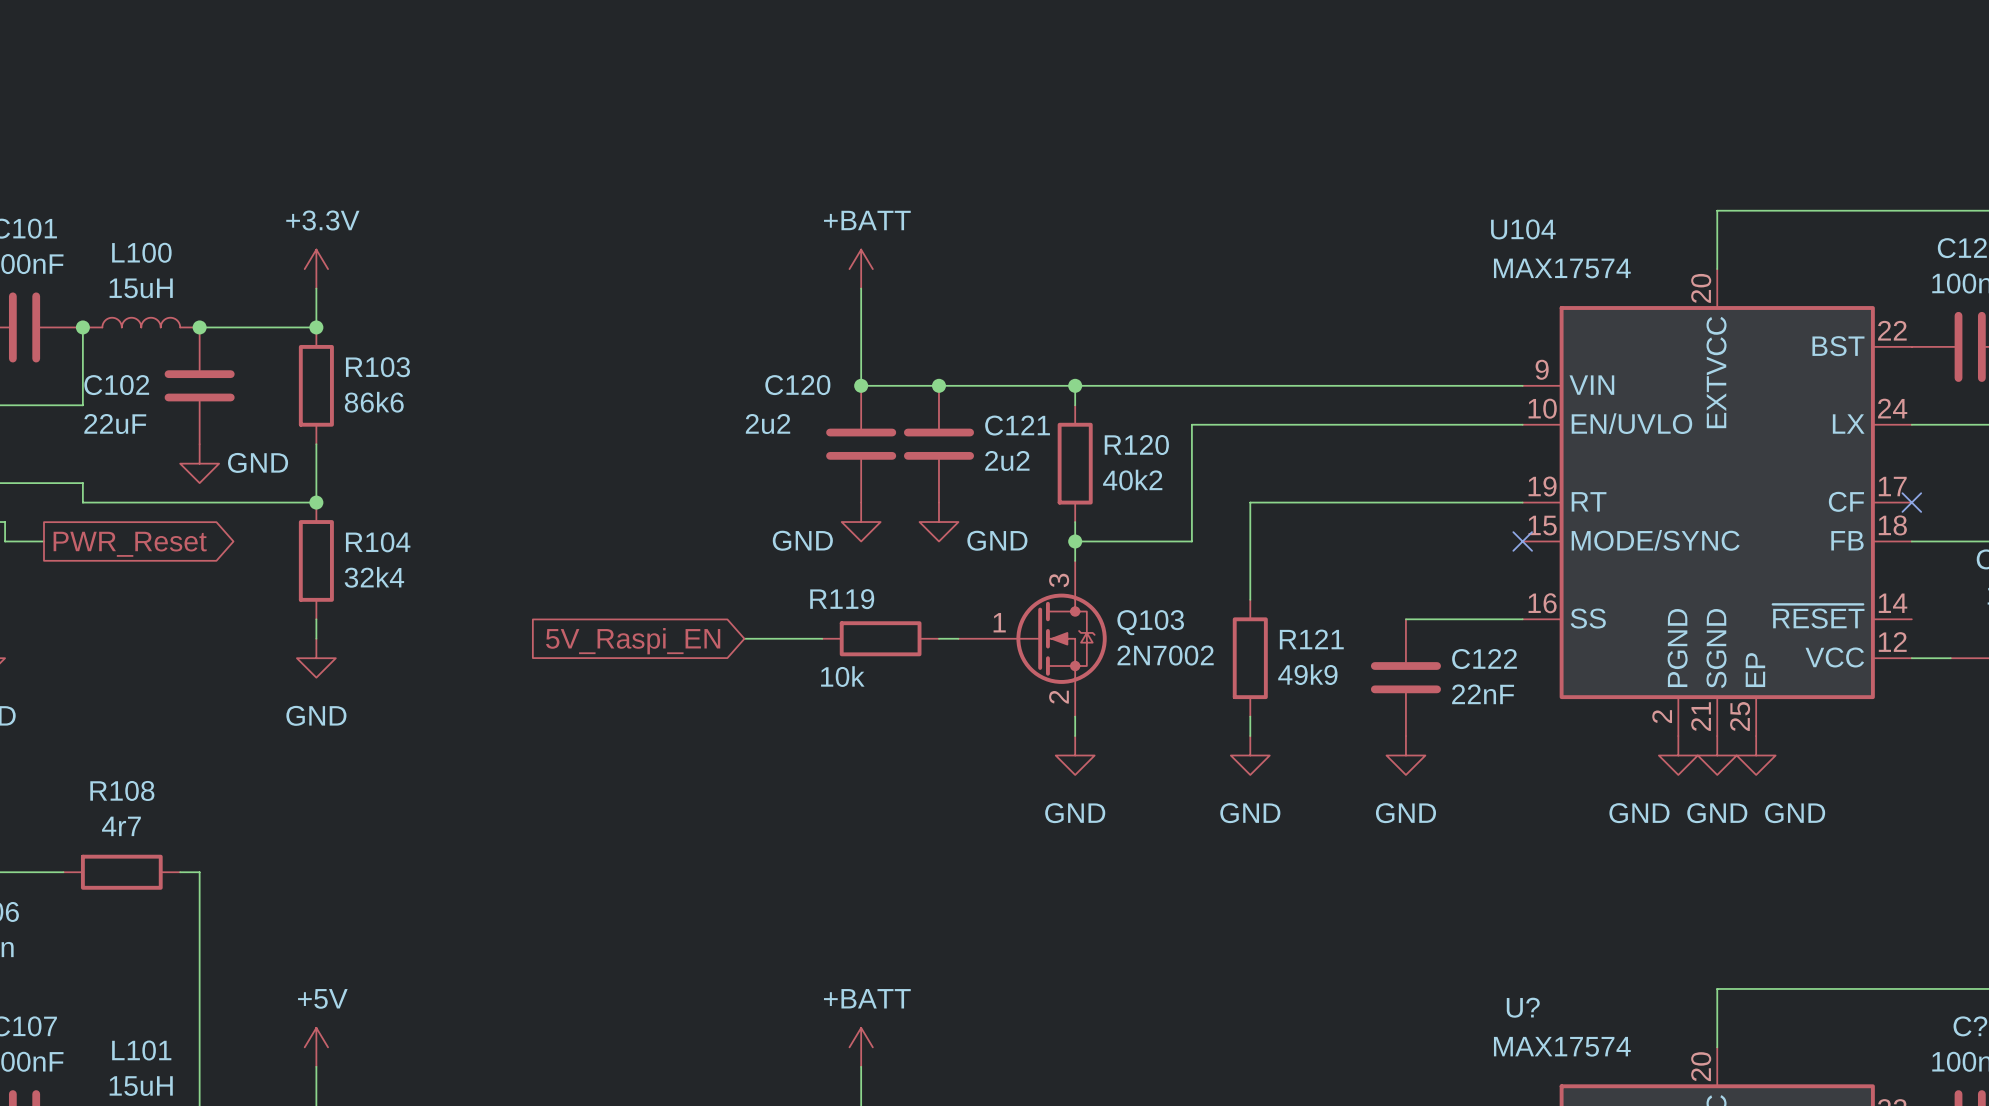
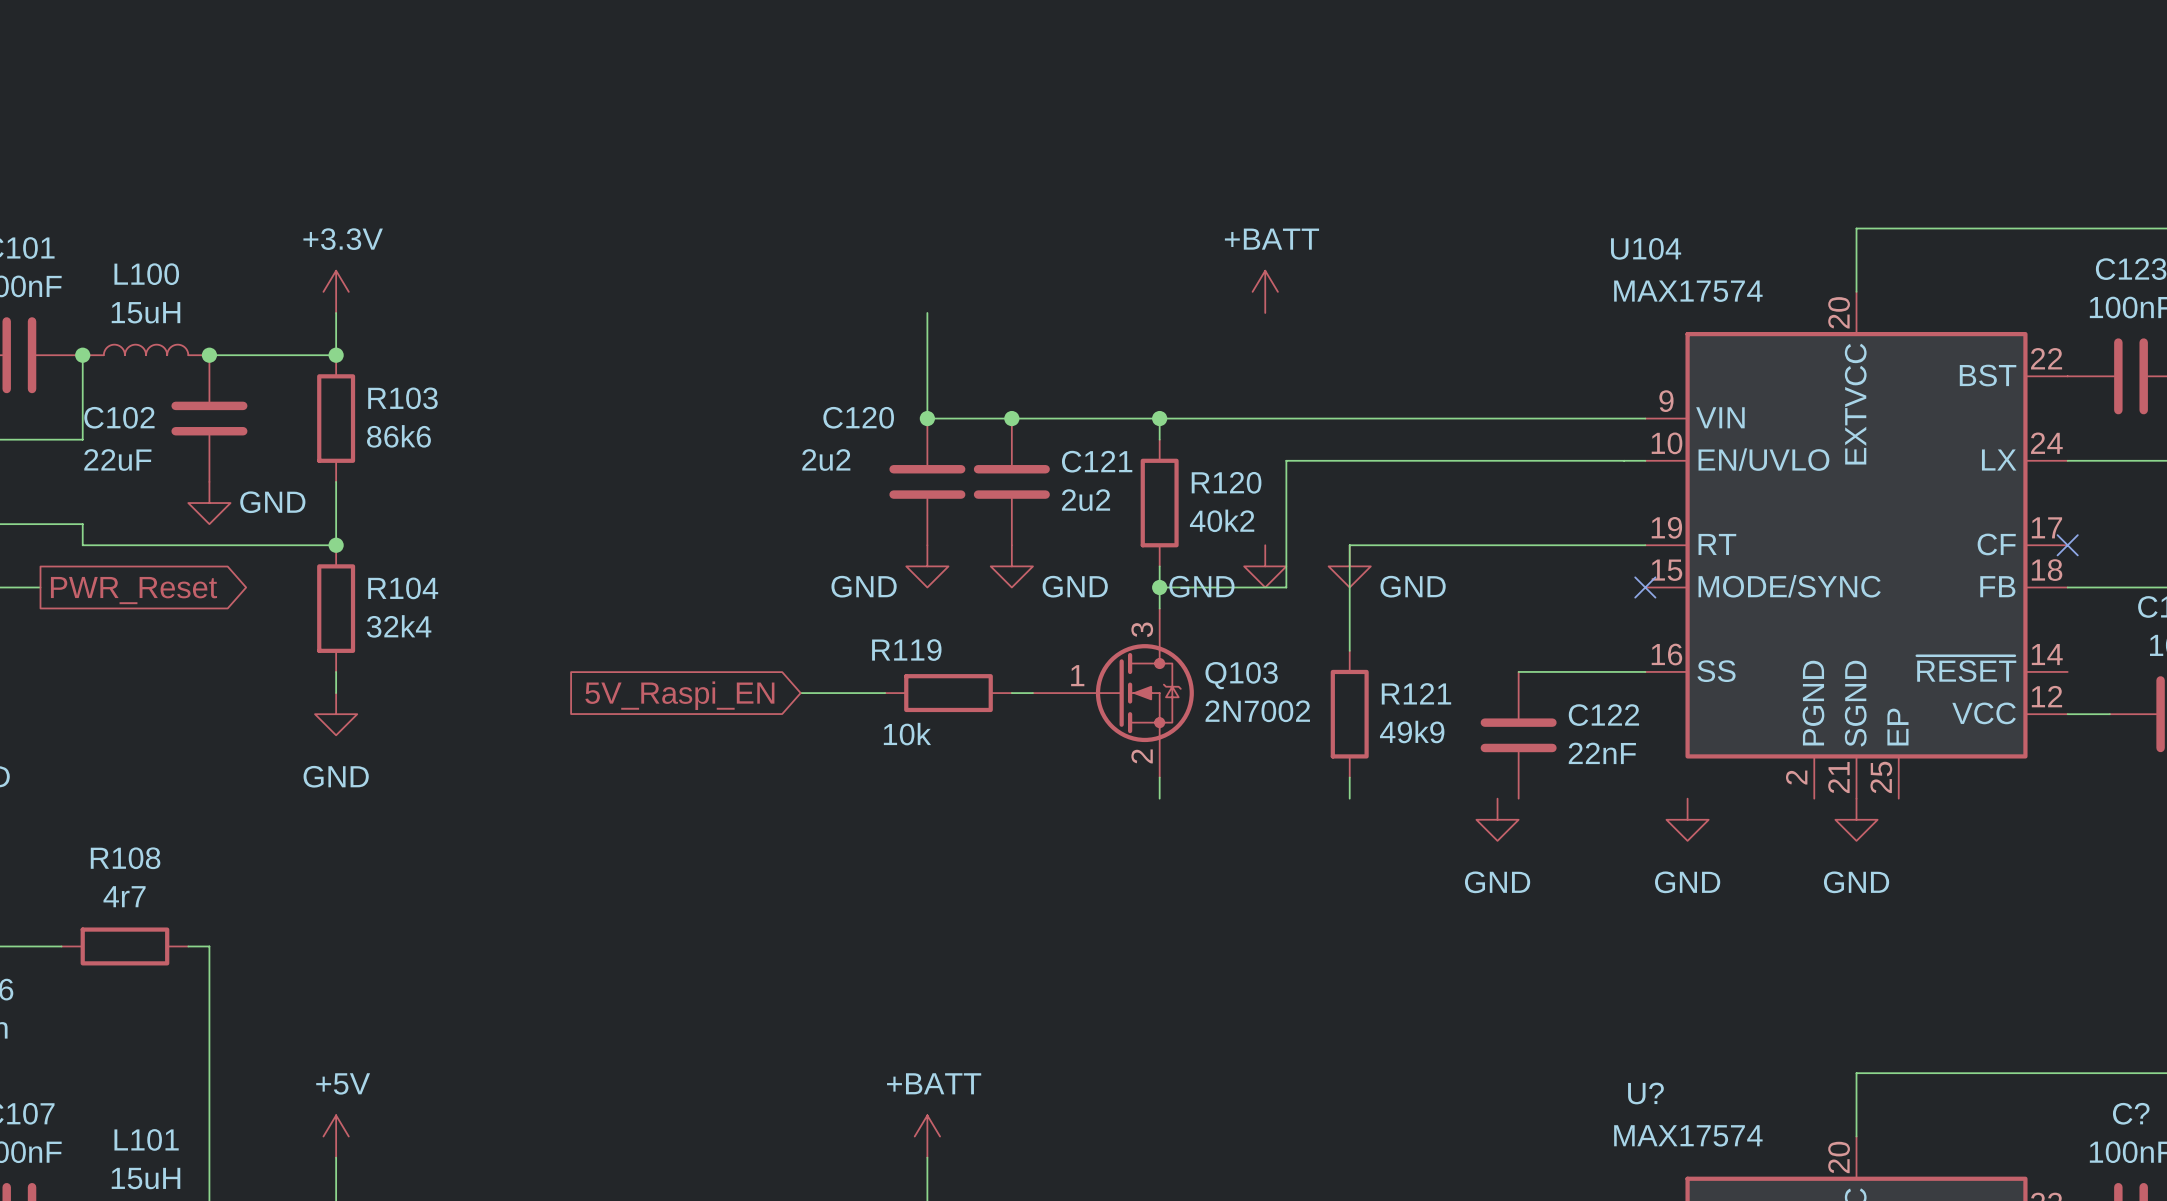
power symbol position: +BATT (861, 269) -> +BATT (1265, 291)
power symbol: none -> GND (1265, 566)
power symbol: none -> GND (1349, 566)
power symbol: GND (1075, 755) -> none
power symbol: GND (1250, 755) -> none
power symbol position: GND (1405, 755) -> GND (1497, 819)
power symbol: none -> GND (1687, 819)
power symbol: GND (1678, 755) -> none
power symbol: GND (1756, 755) -> none

